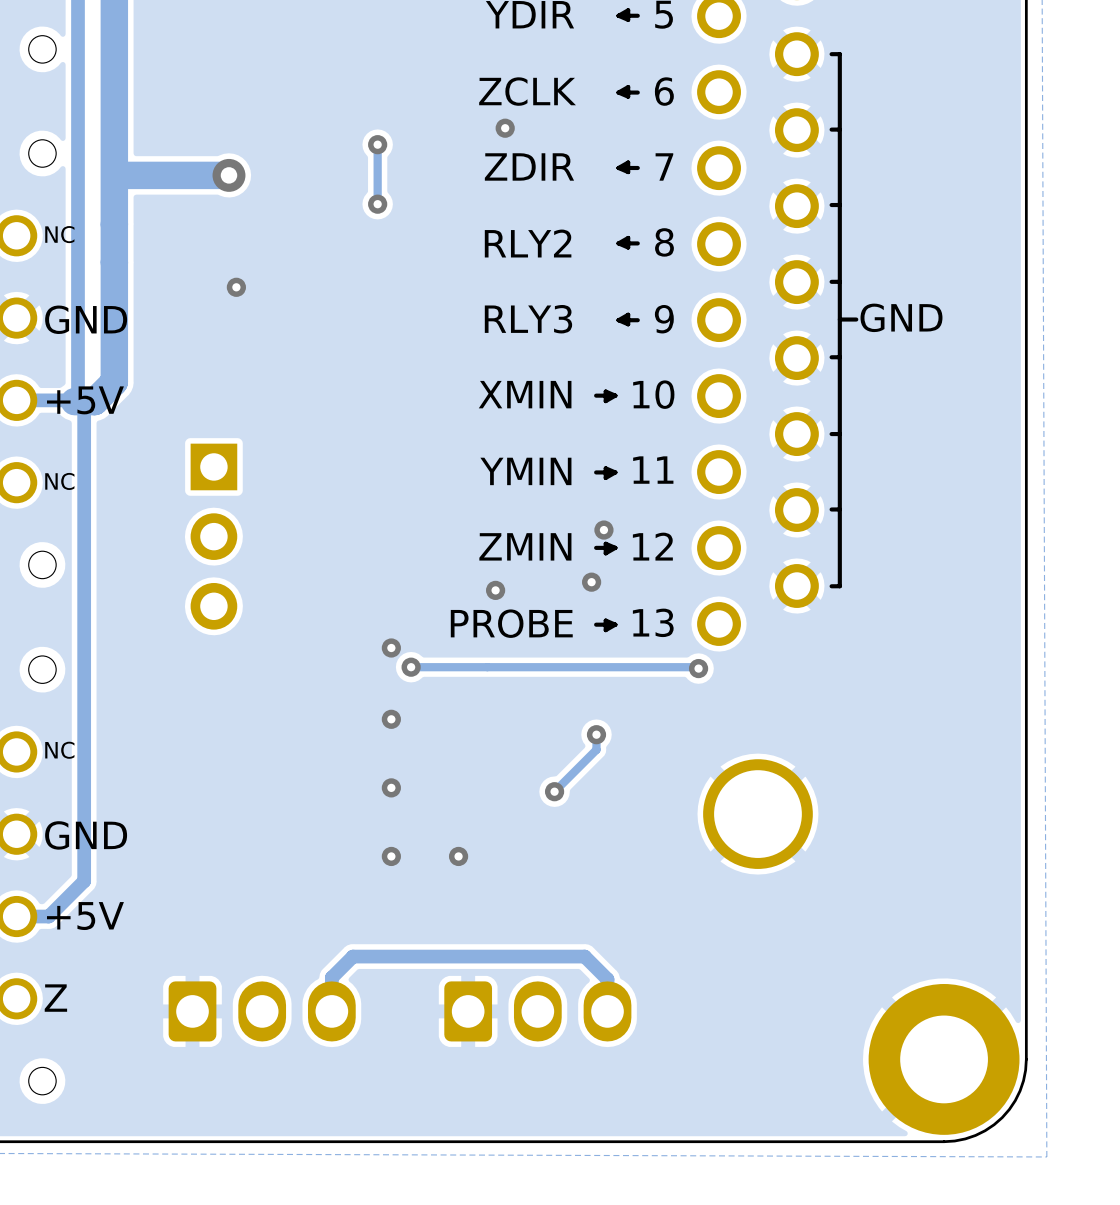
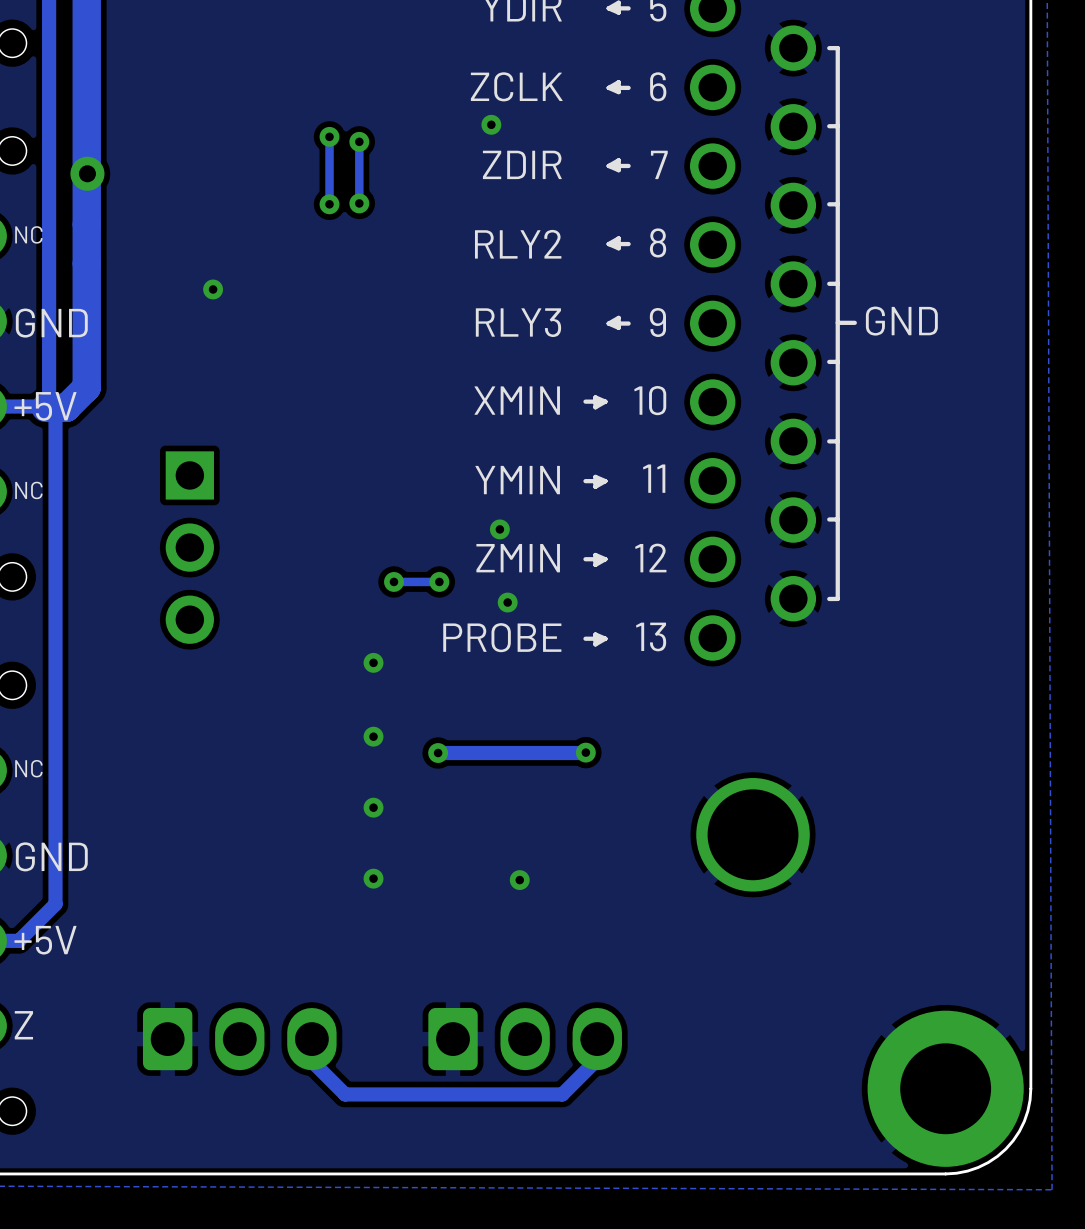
track: none -> (329, 136) (329, 204)
via: none -> (329, 136)
track: (228, 175) (114, 175) -> none
via position: (228, 175) -> (87, 173)
via: none -> (329, 204)
via: none -> (499, 529)
via: (603, 530) -> none
via: none -> (393, 581)
track: none -> (439, 581) (393, 581)
via: none -> (439, 581)
via: (591, 582) -> none
via: none -> (507, 602)
via: (495, 590) -> none
track: (411, 667) (698, 668) -> none
via: (411, 667) -> none
via: (698, 668) -> none
track: (596, 734) (596, 749) (554, 791) -> (585, 752) (438, 753)
via: none -> (438, 753)
via: (554, 791) -> none
via: (458, 856) -> none
via: none -> (519, 880)
track: (607, 1011) (607, 979) (584, 956) (352, 956) (331, 977) (331, 1011) -> (597, 1039) (597, 1059) (562, 1094) (345, 1094) (311, 1061) (311, 1039)

